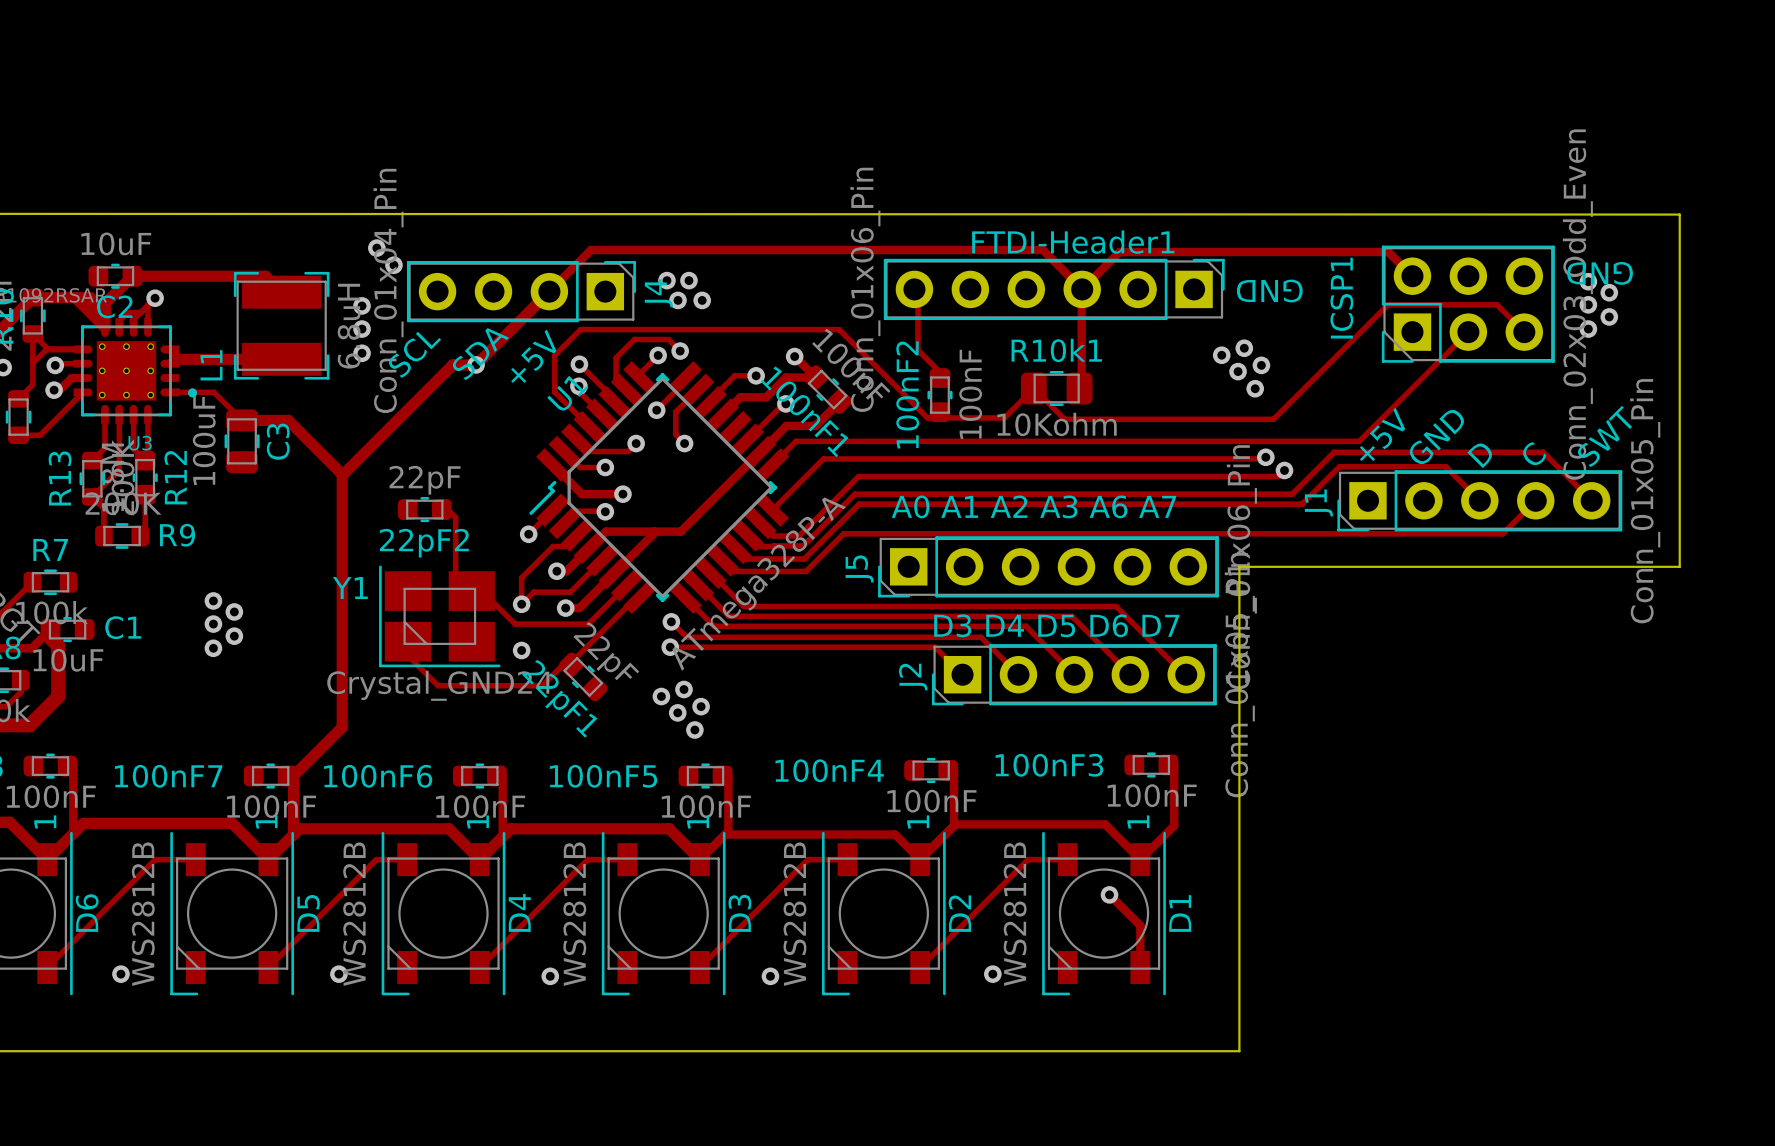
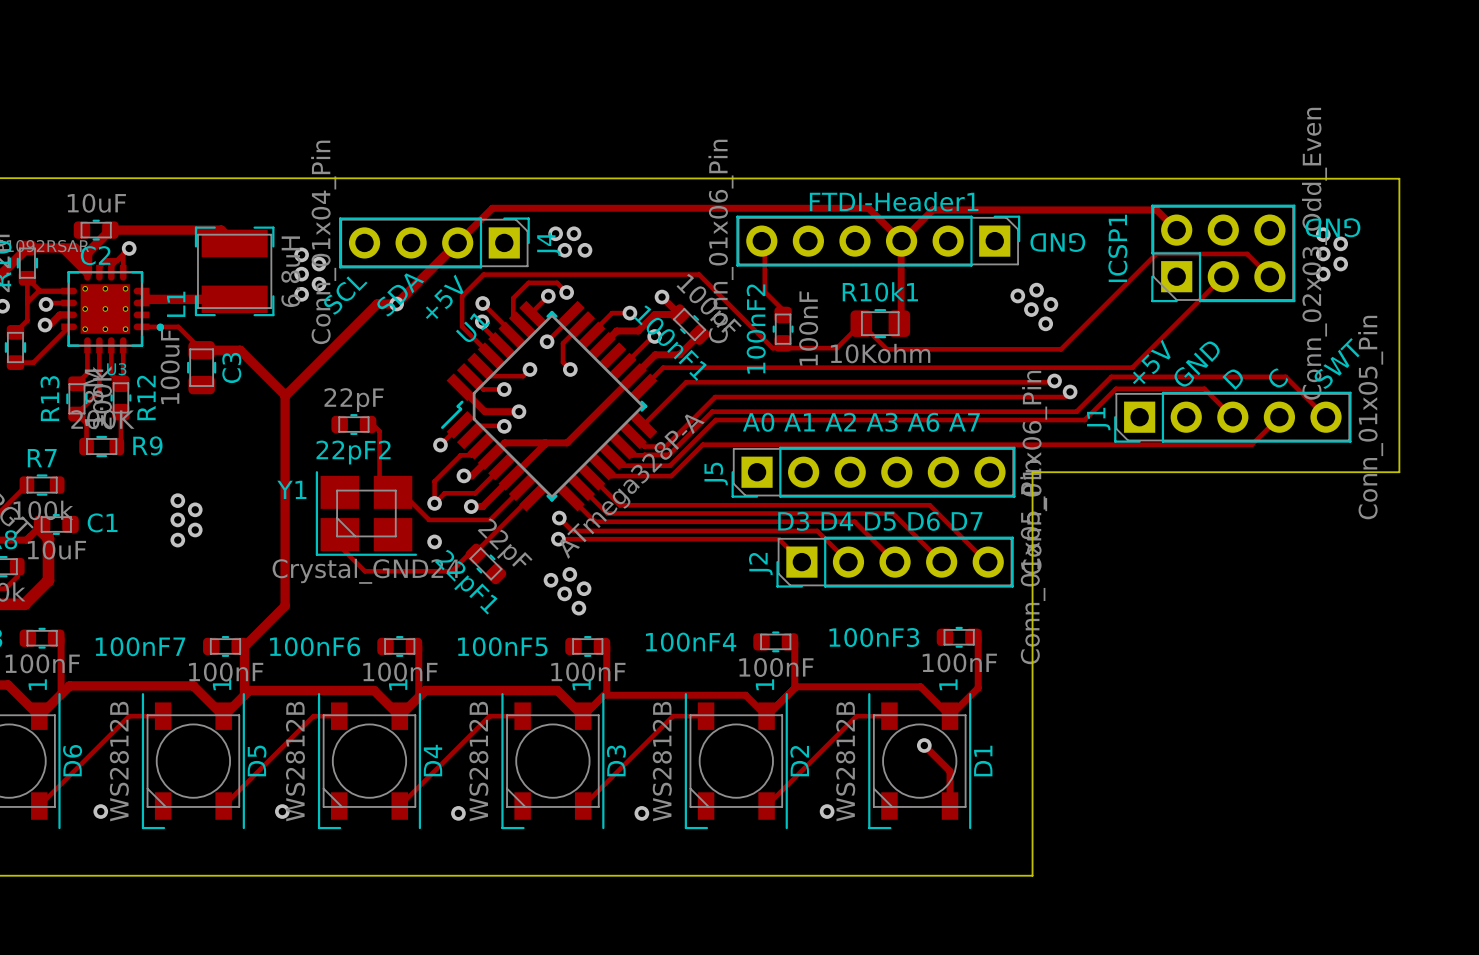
via: (376, 248) -> none
via: (393, 265) -> none
via: none -> (319, 264)
via: none -> (319, 284)

